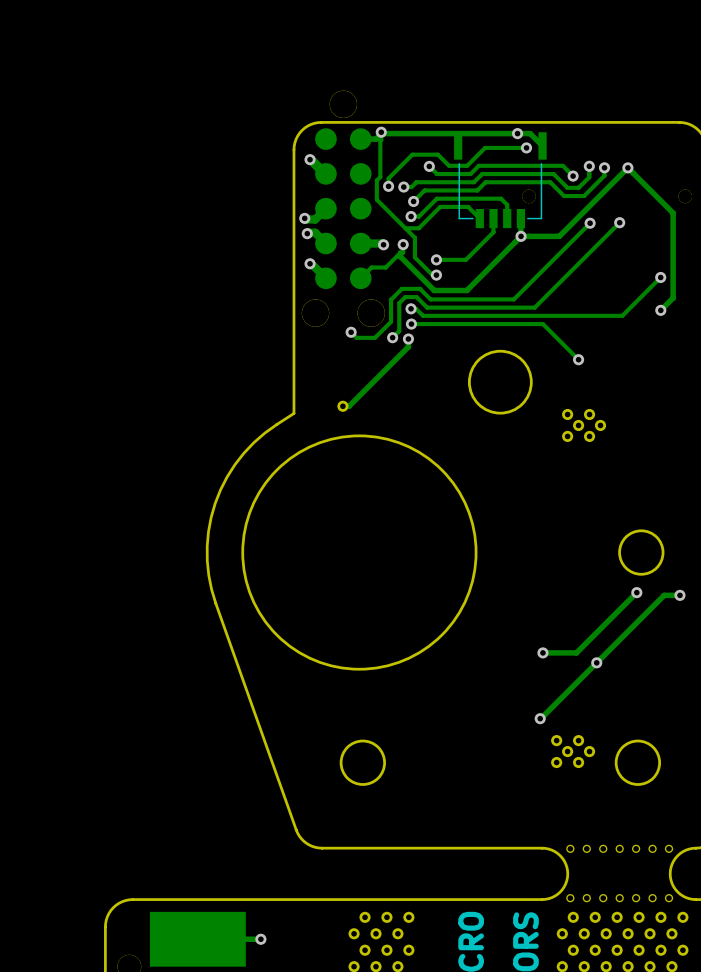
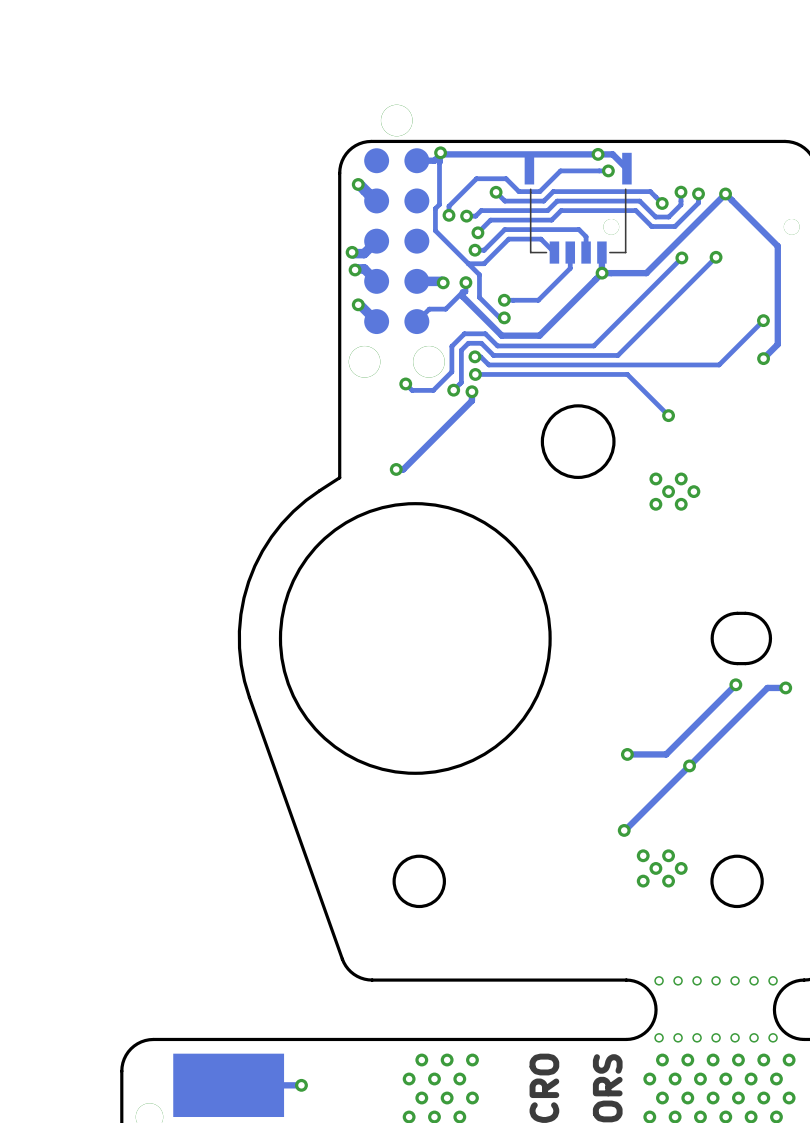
round board edge: [618, 529, 665, 576] -> none
board edge: none -> (745, 613) (734, 613) (724, 616) (717, 623) (713, 631) (712, 641) (715, 651) (722, 658) (730, 662) (754, 661) (763, 656) (769, 644) (769, 631) (765, 623) (754, 615) (745, 613)

